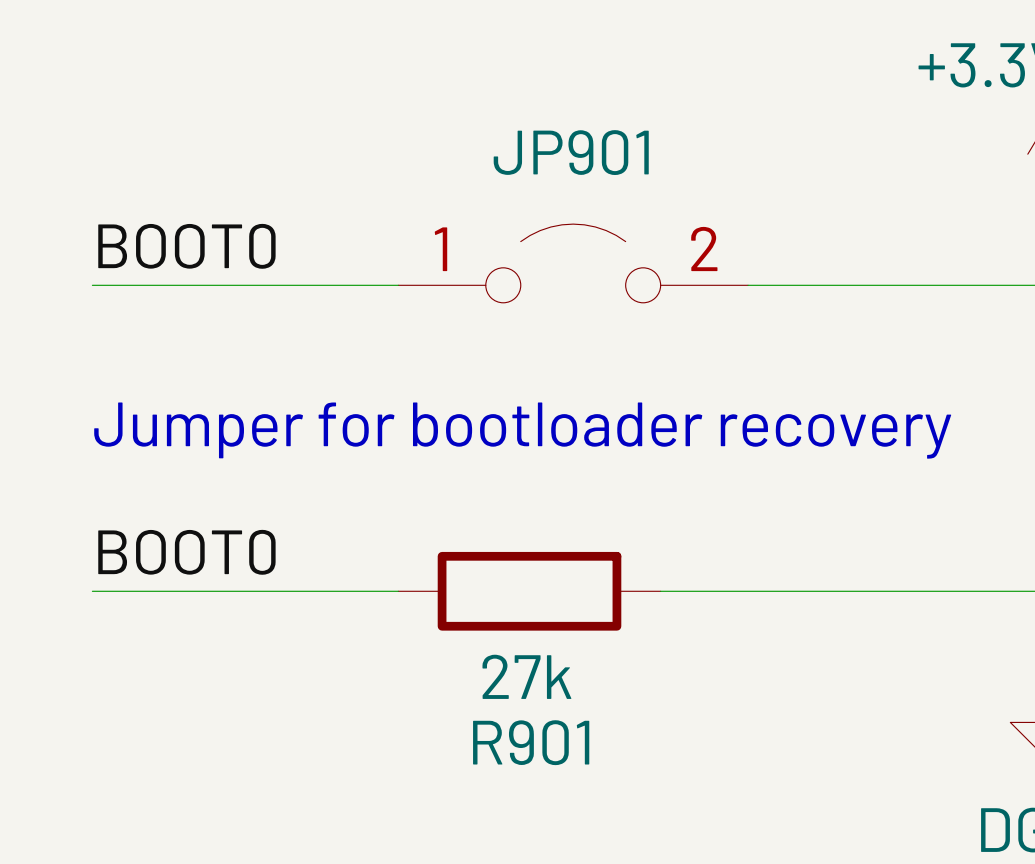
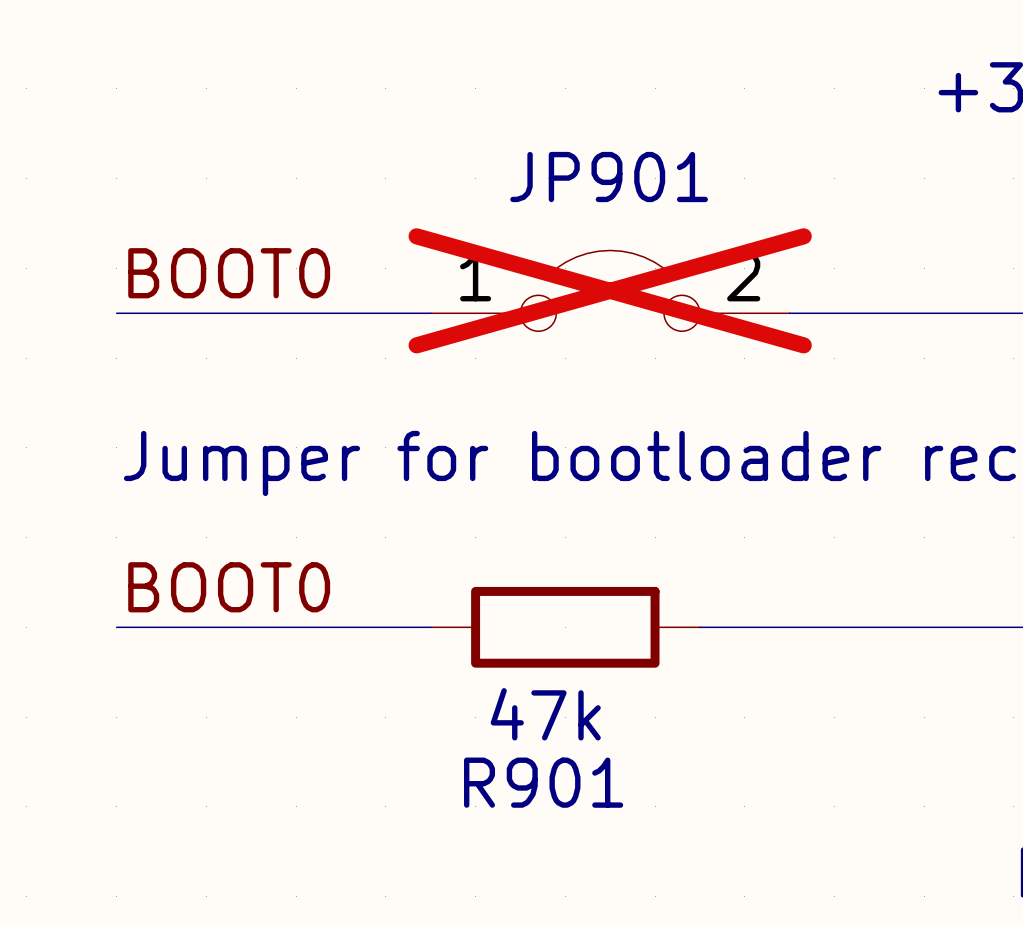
JP901 do-not-place cross: none -> (610, 290)
R901 value: 27k (526, 676) -> 47k (545, 714)

